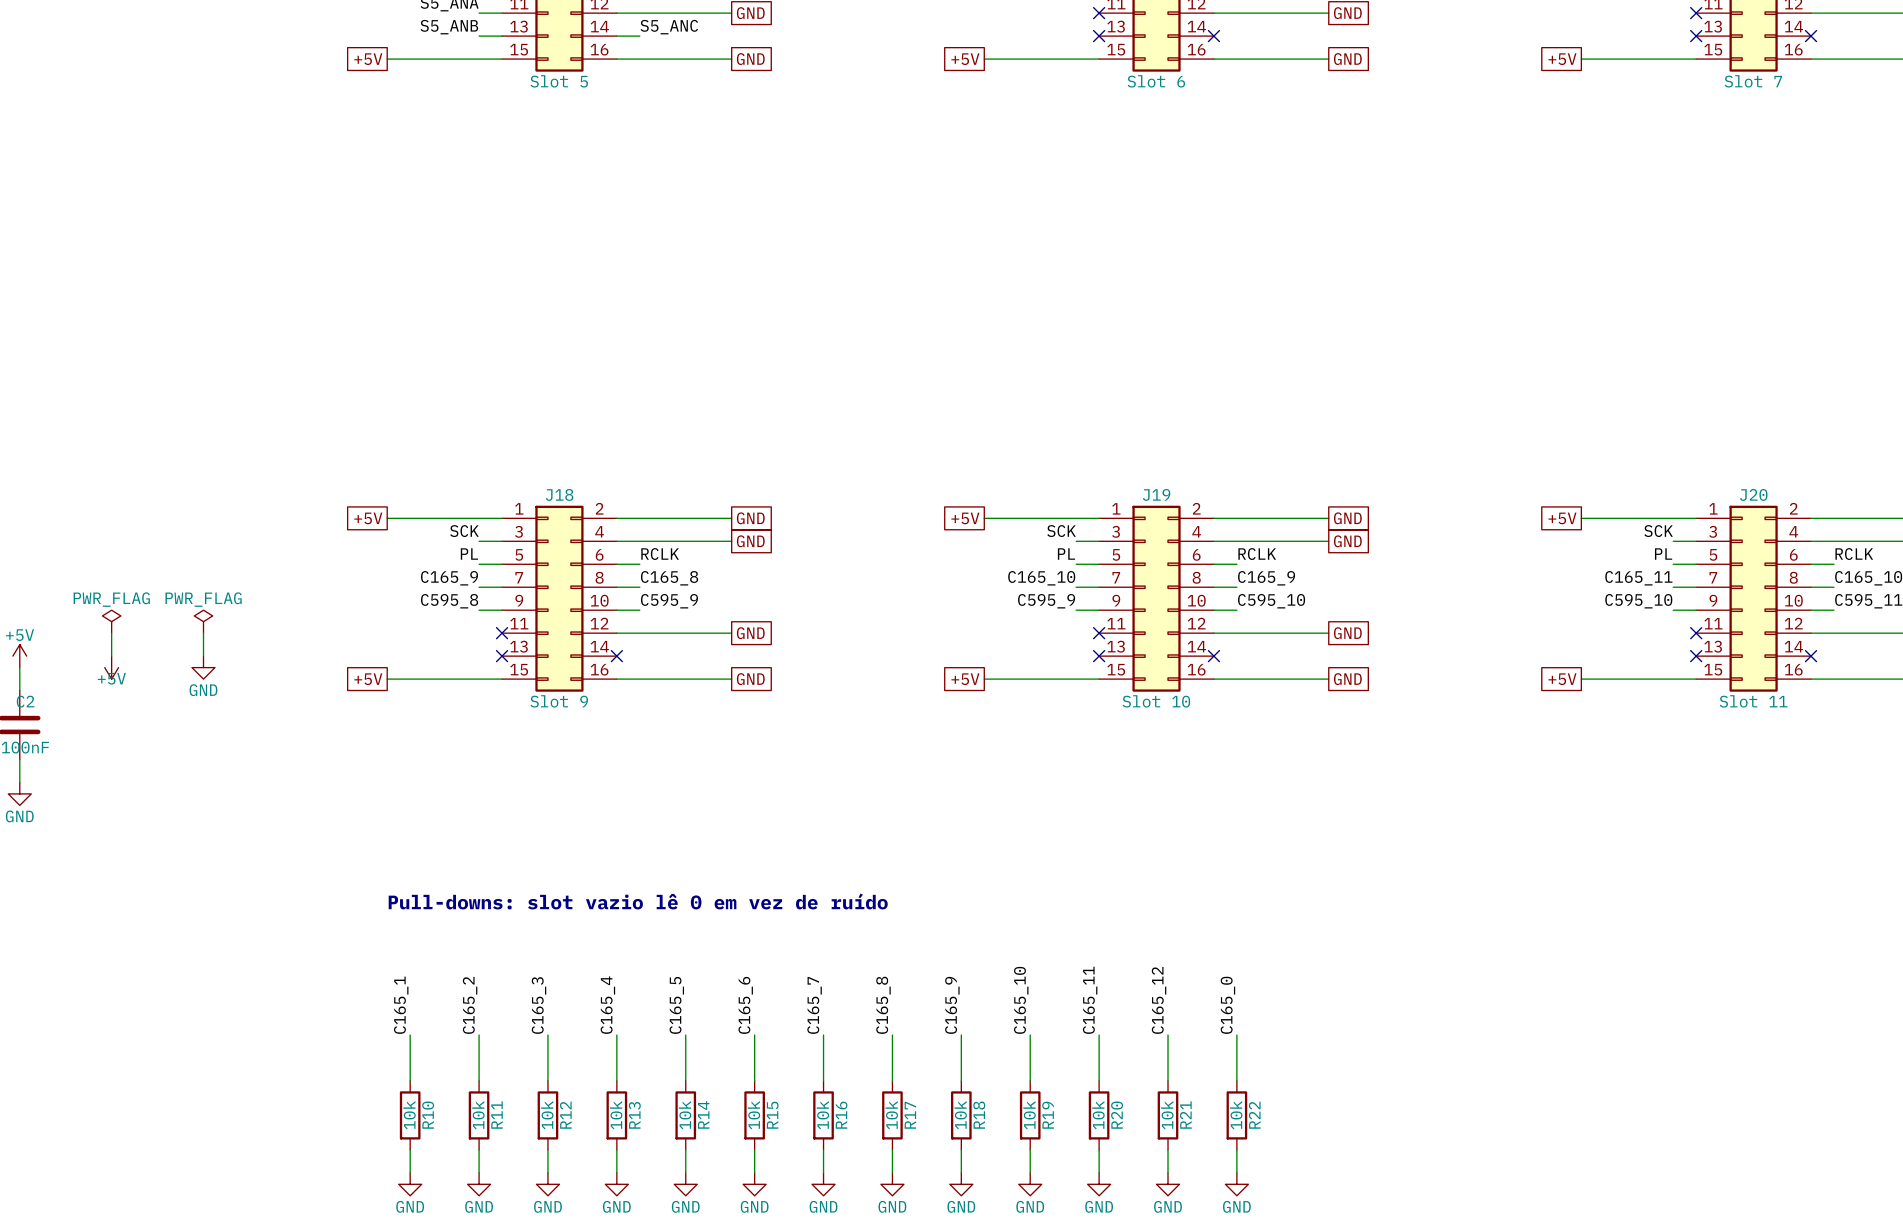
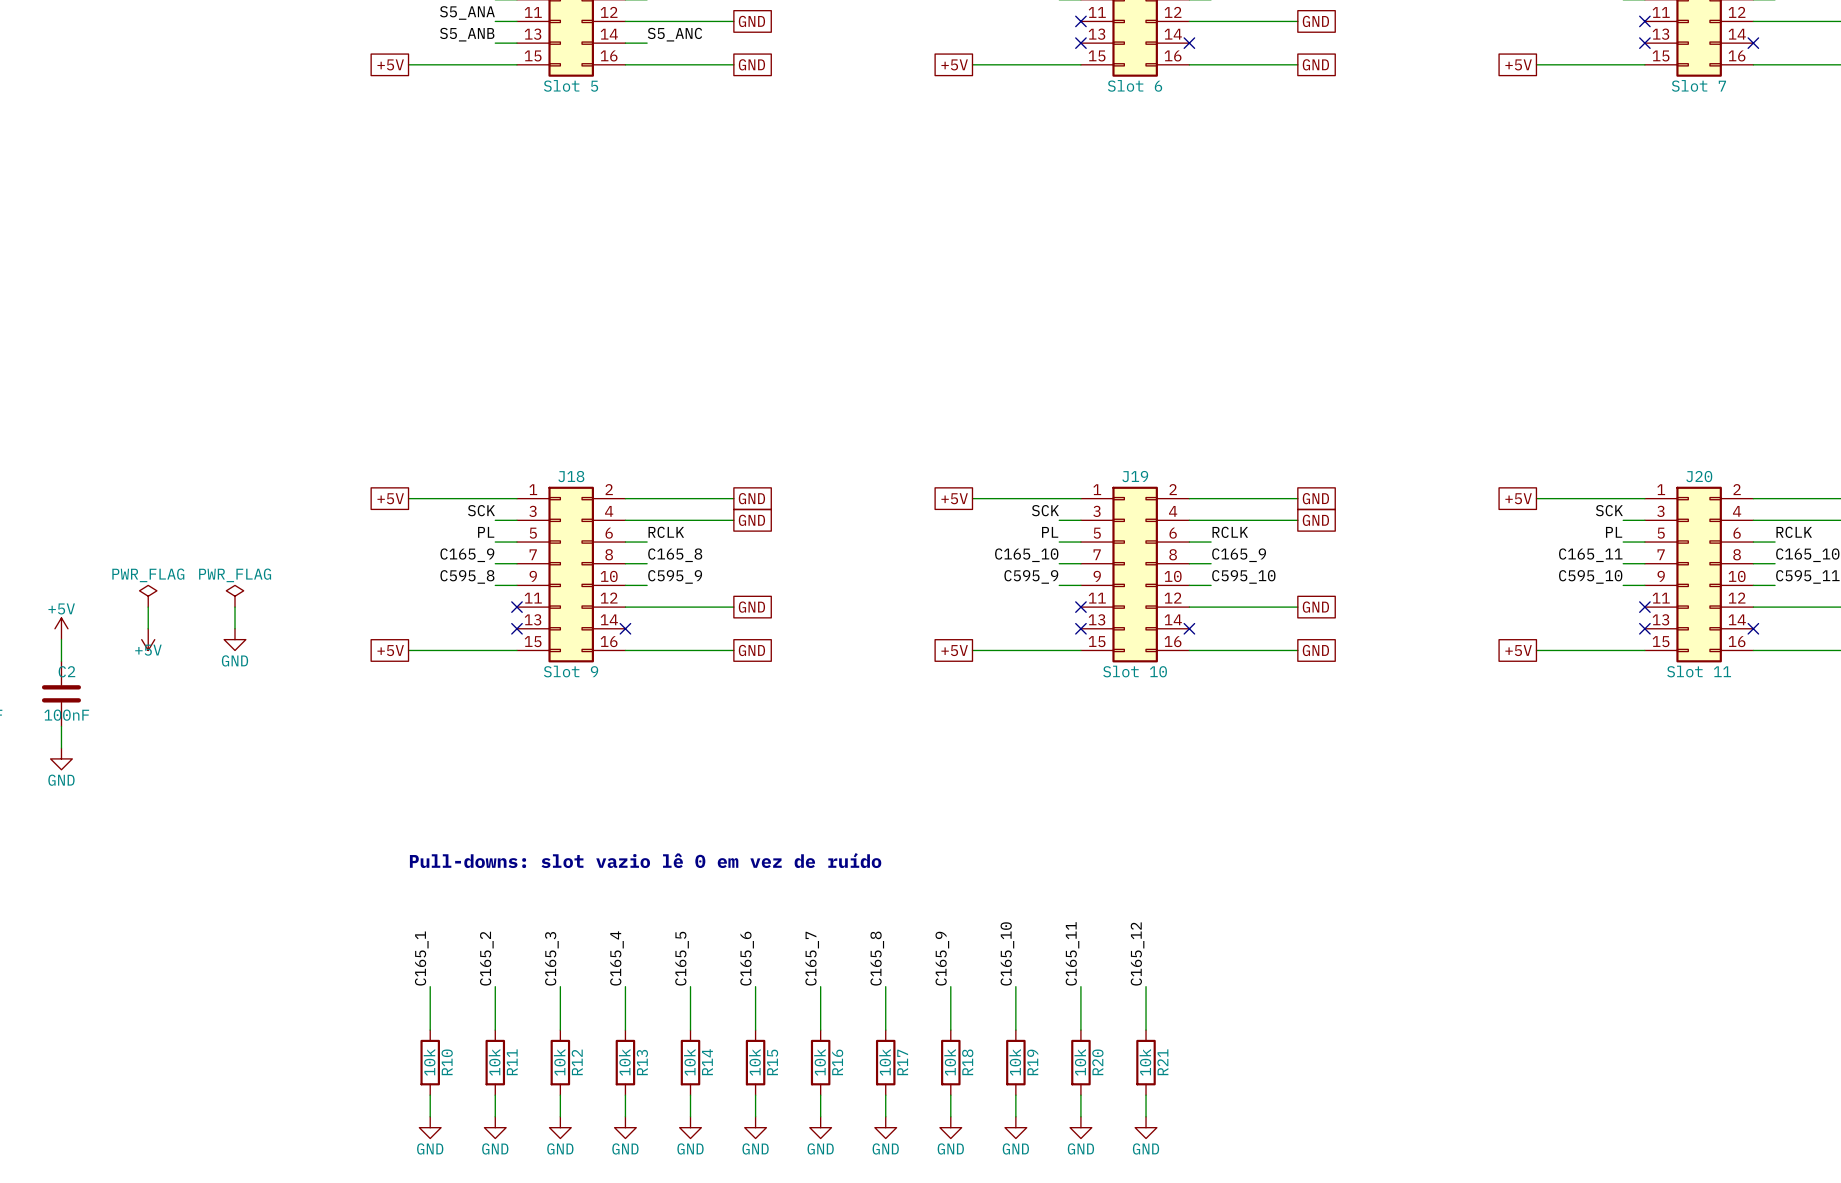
label: C165_0 (1227, 1005) -> none
wire: (1236, 1035) (1236, 1080) -> none
R22: 10k (1236, 1115) -> none
wire: (1236, 1149) (1236, 1172) -> none
power symbol: GND (1236, 1184) -> none

